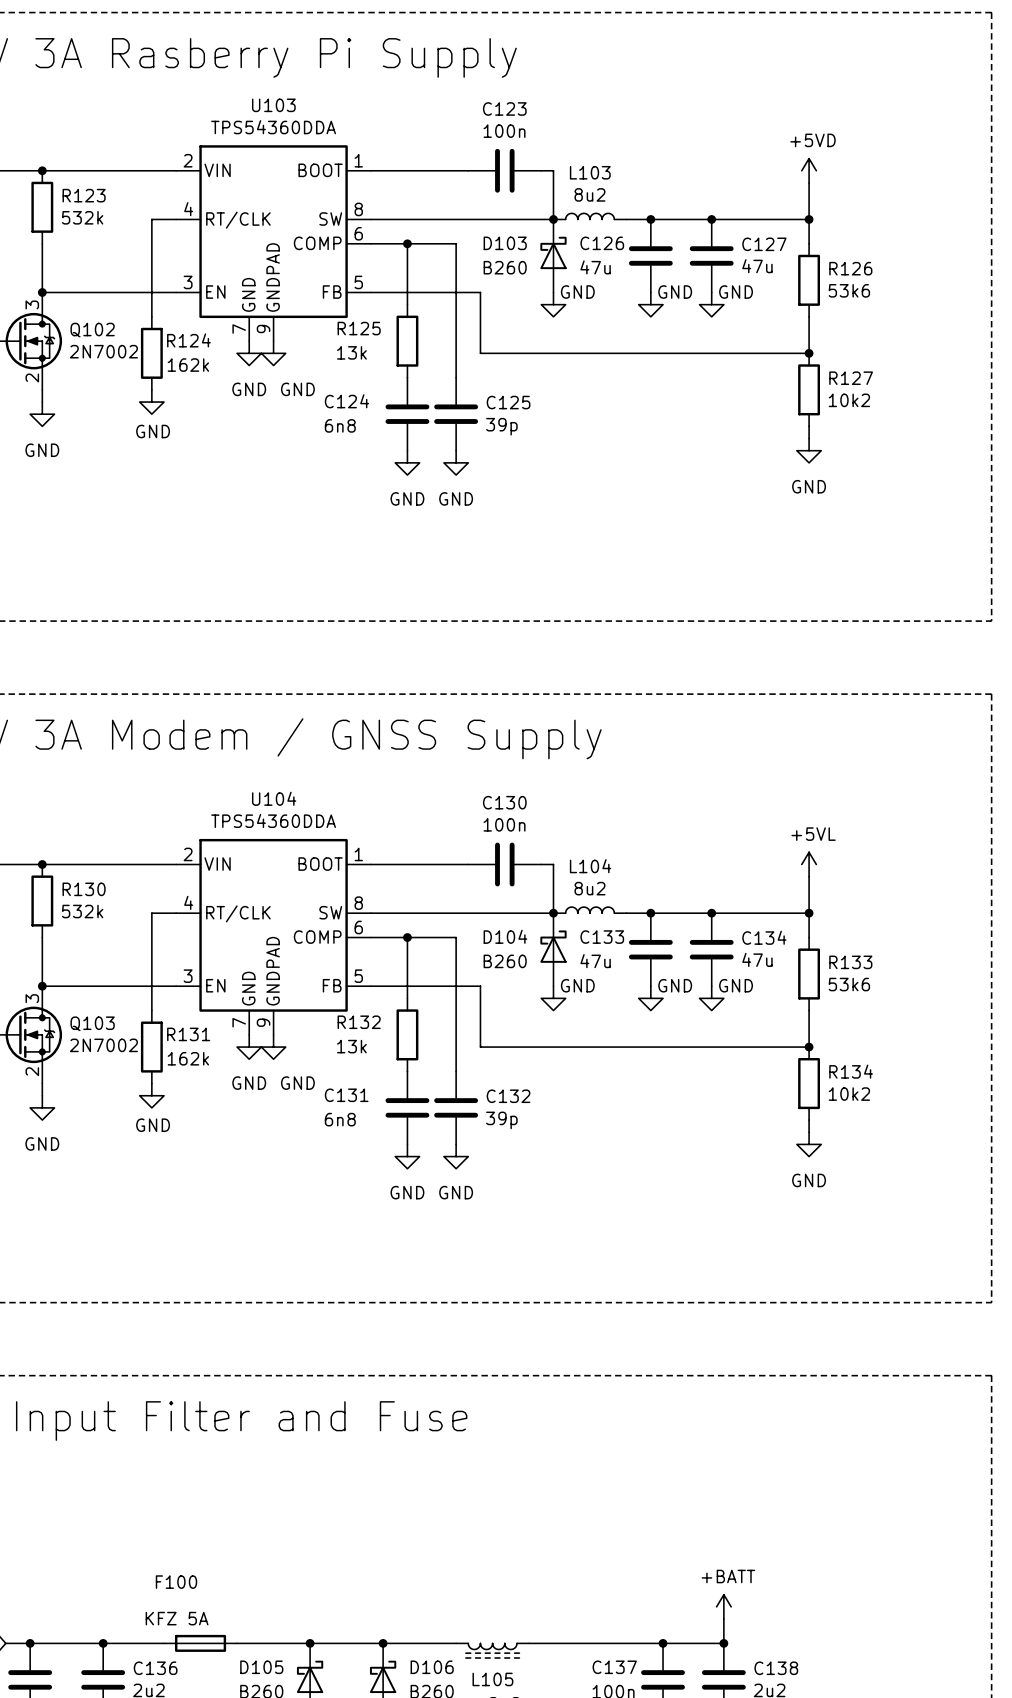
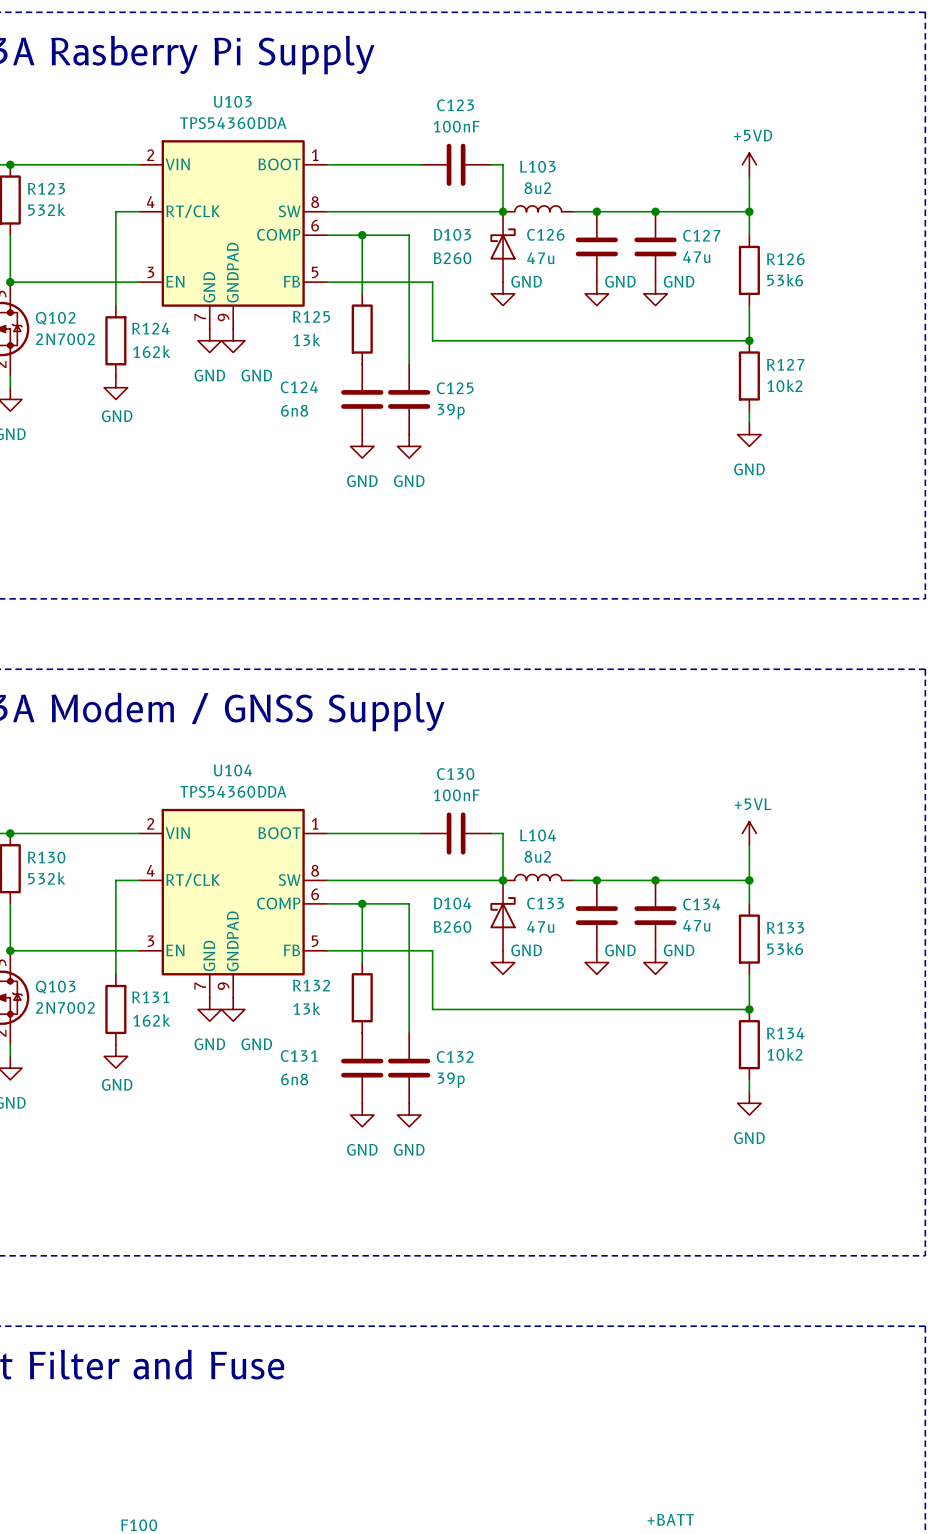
C123 value: 100n (504, 131) -> 100nF (456, 126)
C130 value: 100n (504, 824) -> 100nF (456, 795)

